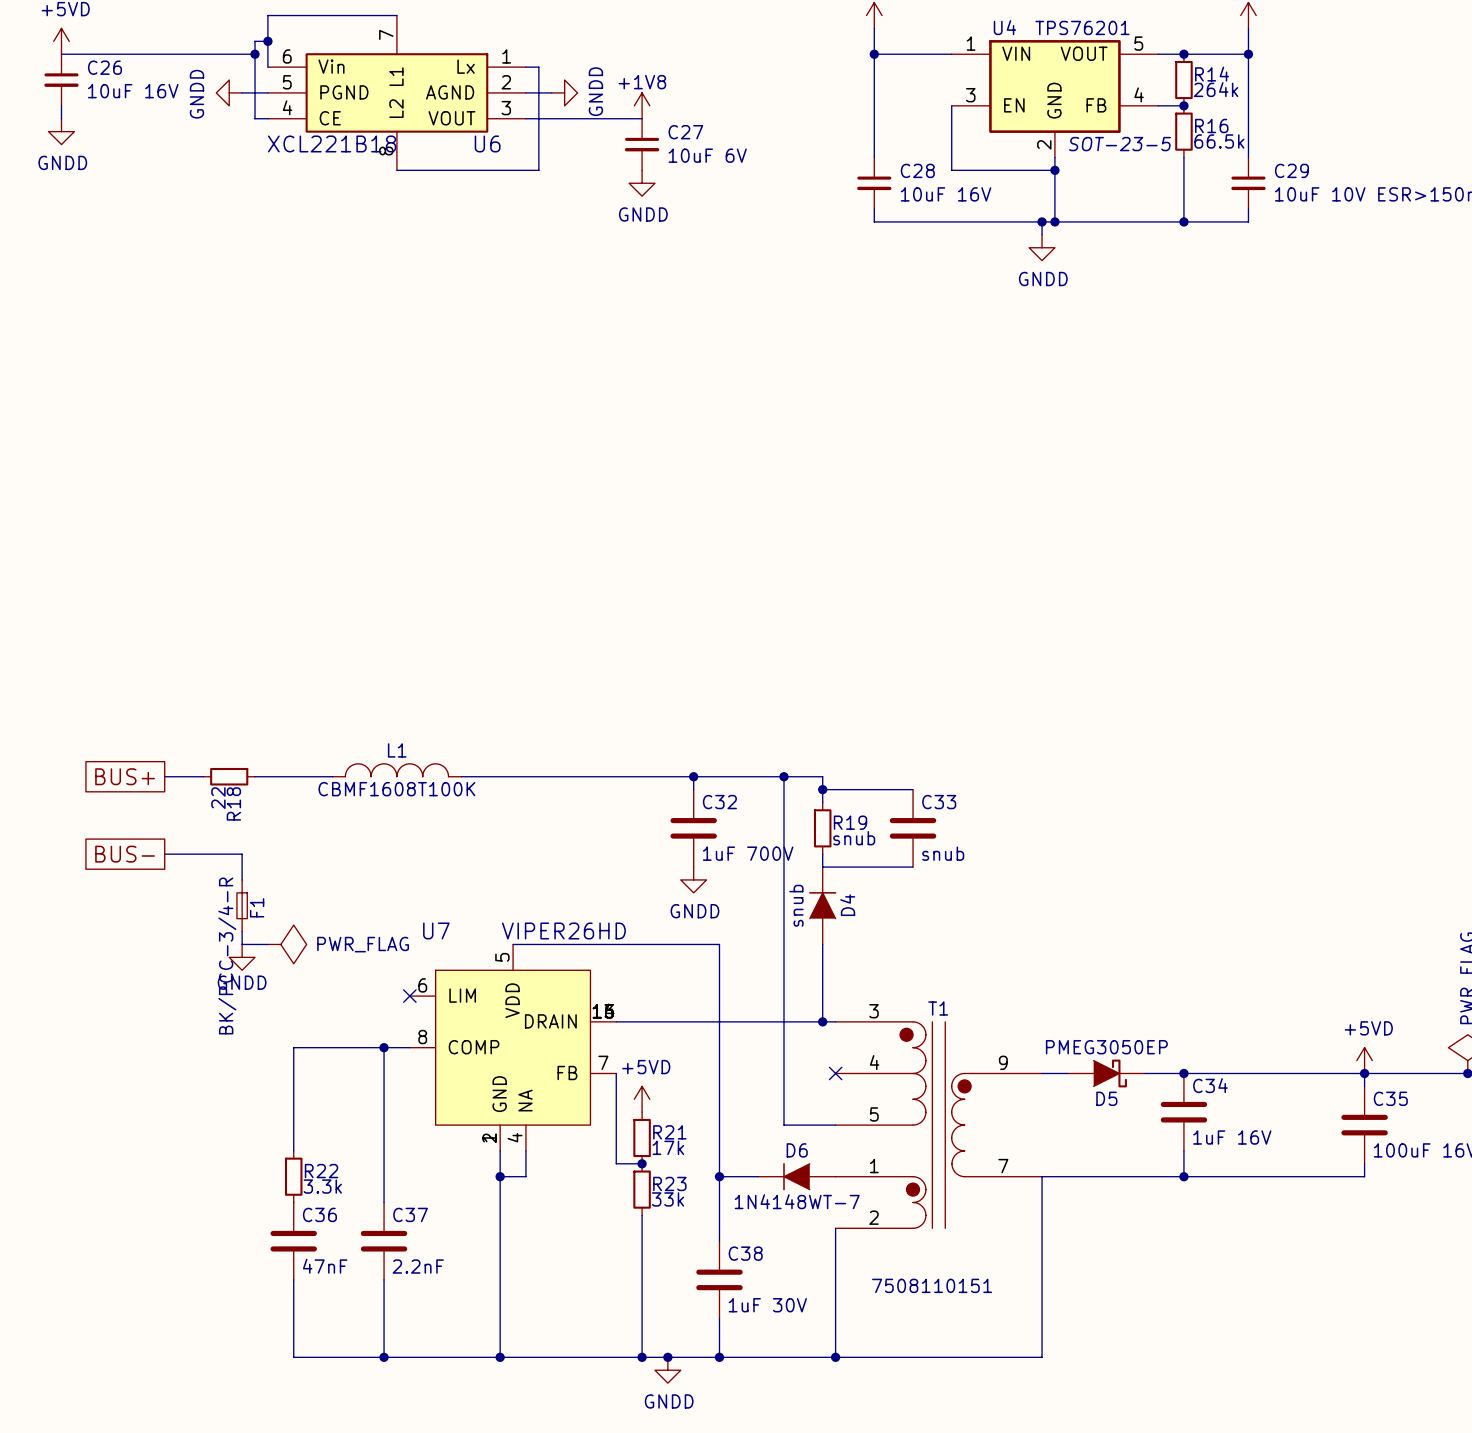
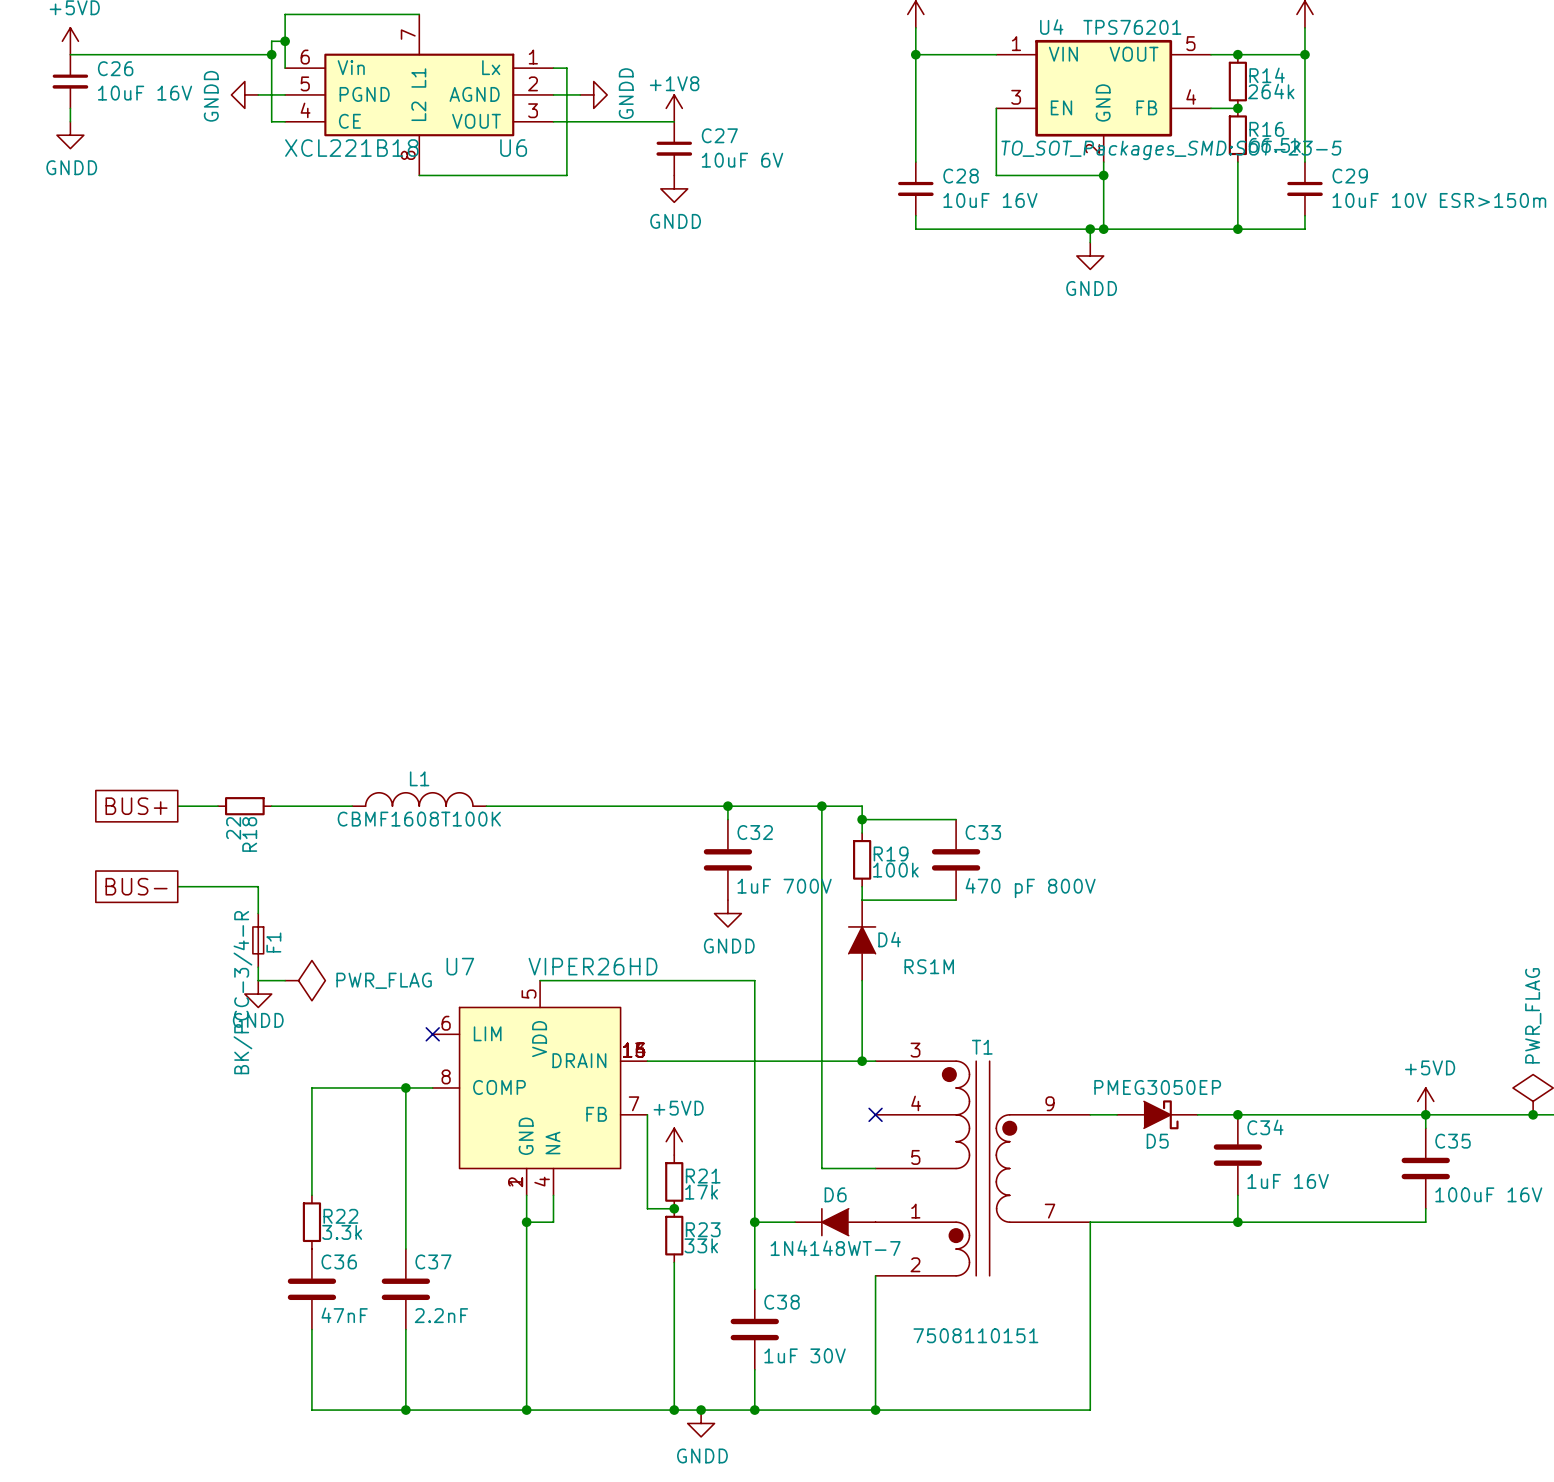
U4 text: SOT-23-5 (1119, 144) -> TO_SOT_Packages_SMD:SOT-23-5 (1171, 150)
R19 value: snub (854, 838) -> 100k (895, 870)
C33 value: snub (943, 853) -> 470 pF 800V (1030, 888)
D4 value: snub (796, 905) -> RS1M (929, 966)
D4 name rotation: 0° (847, 905) -> 90° clockwise (889, 939)

